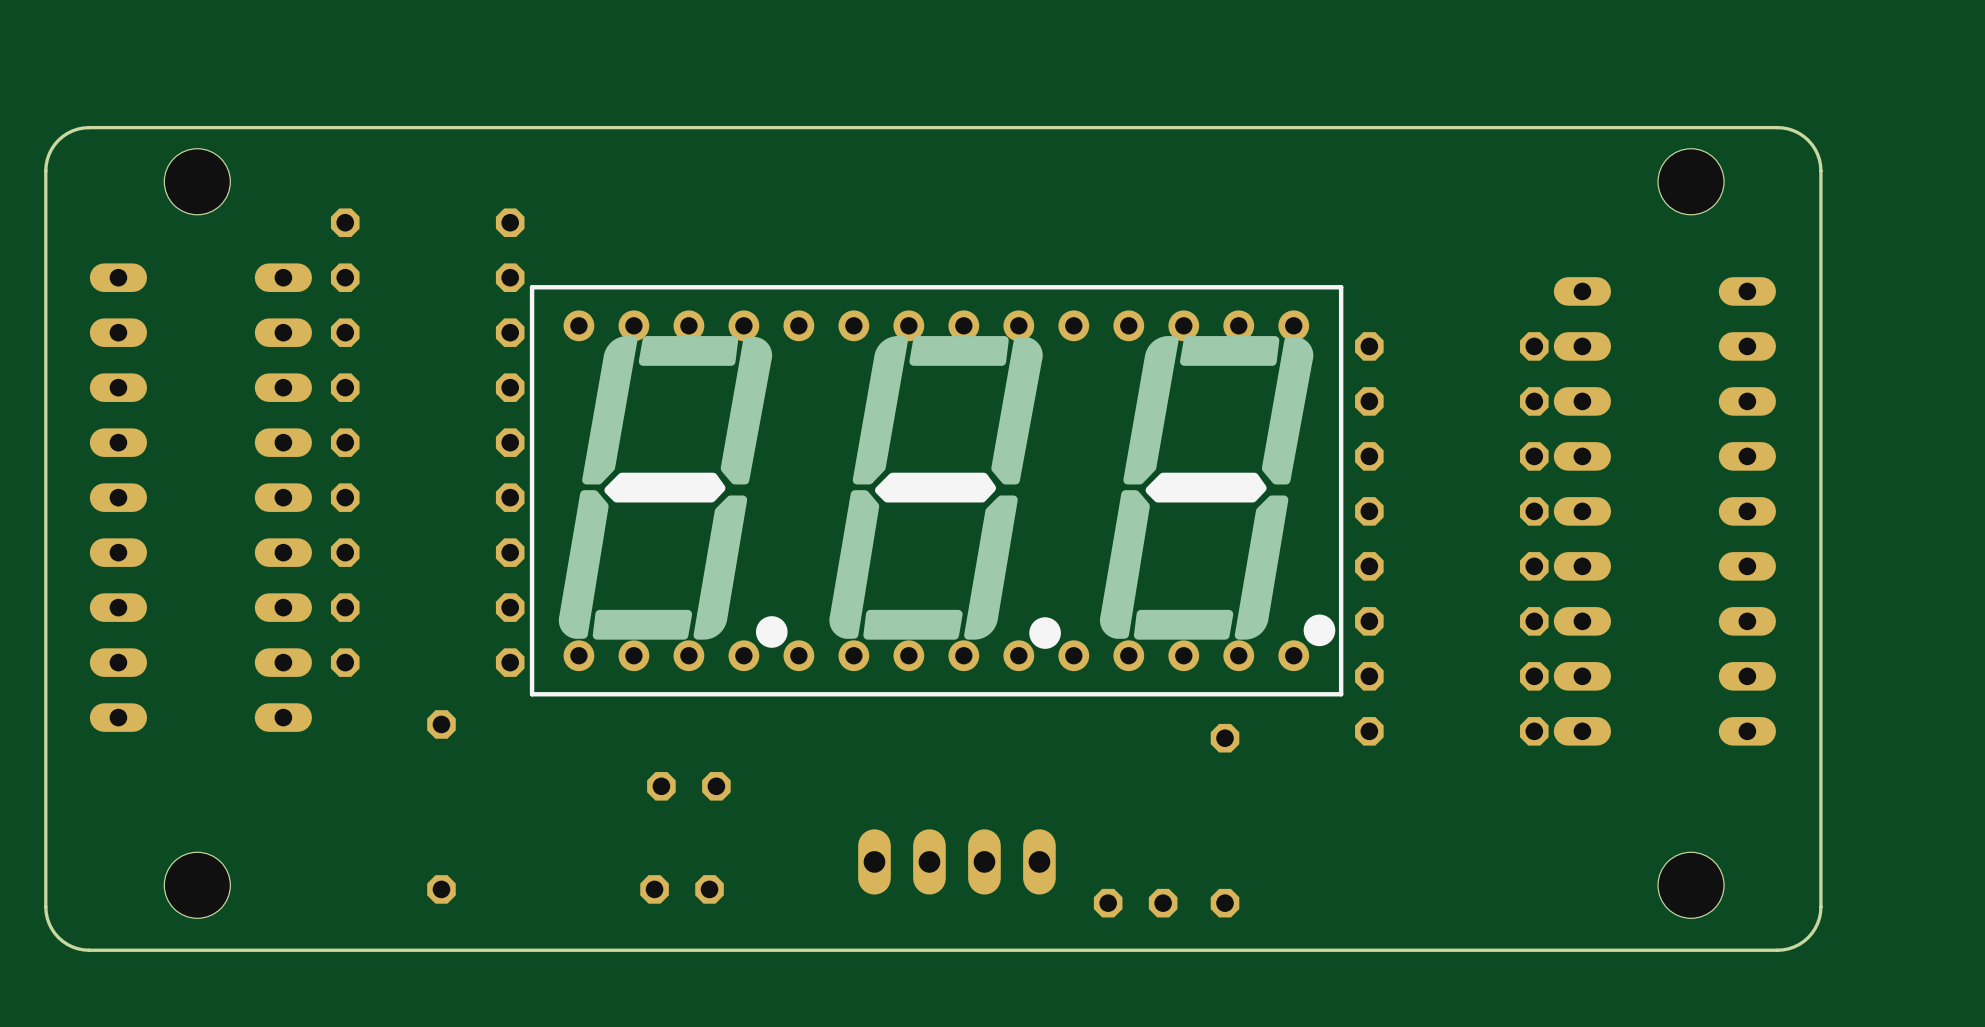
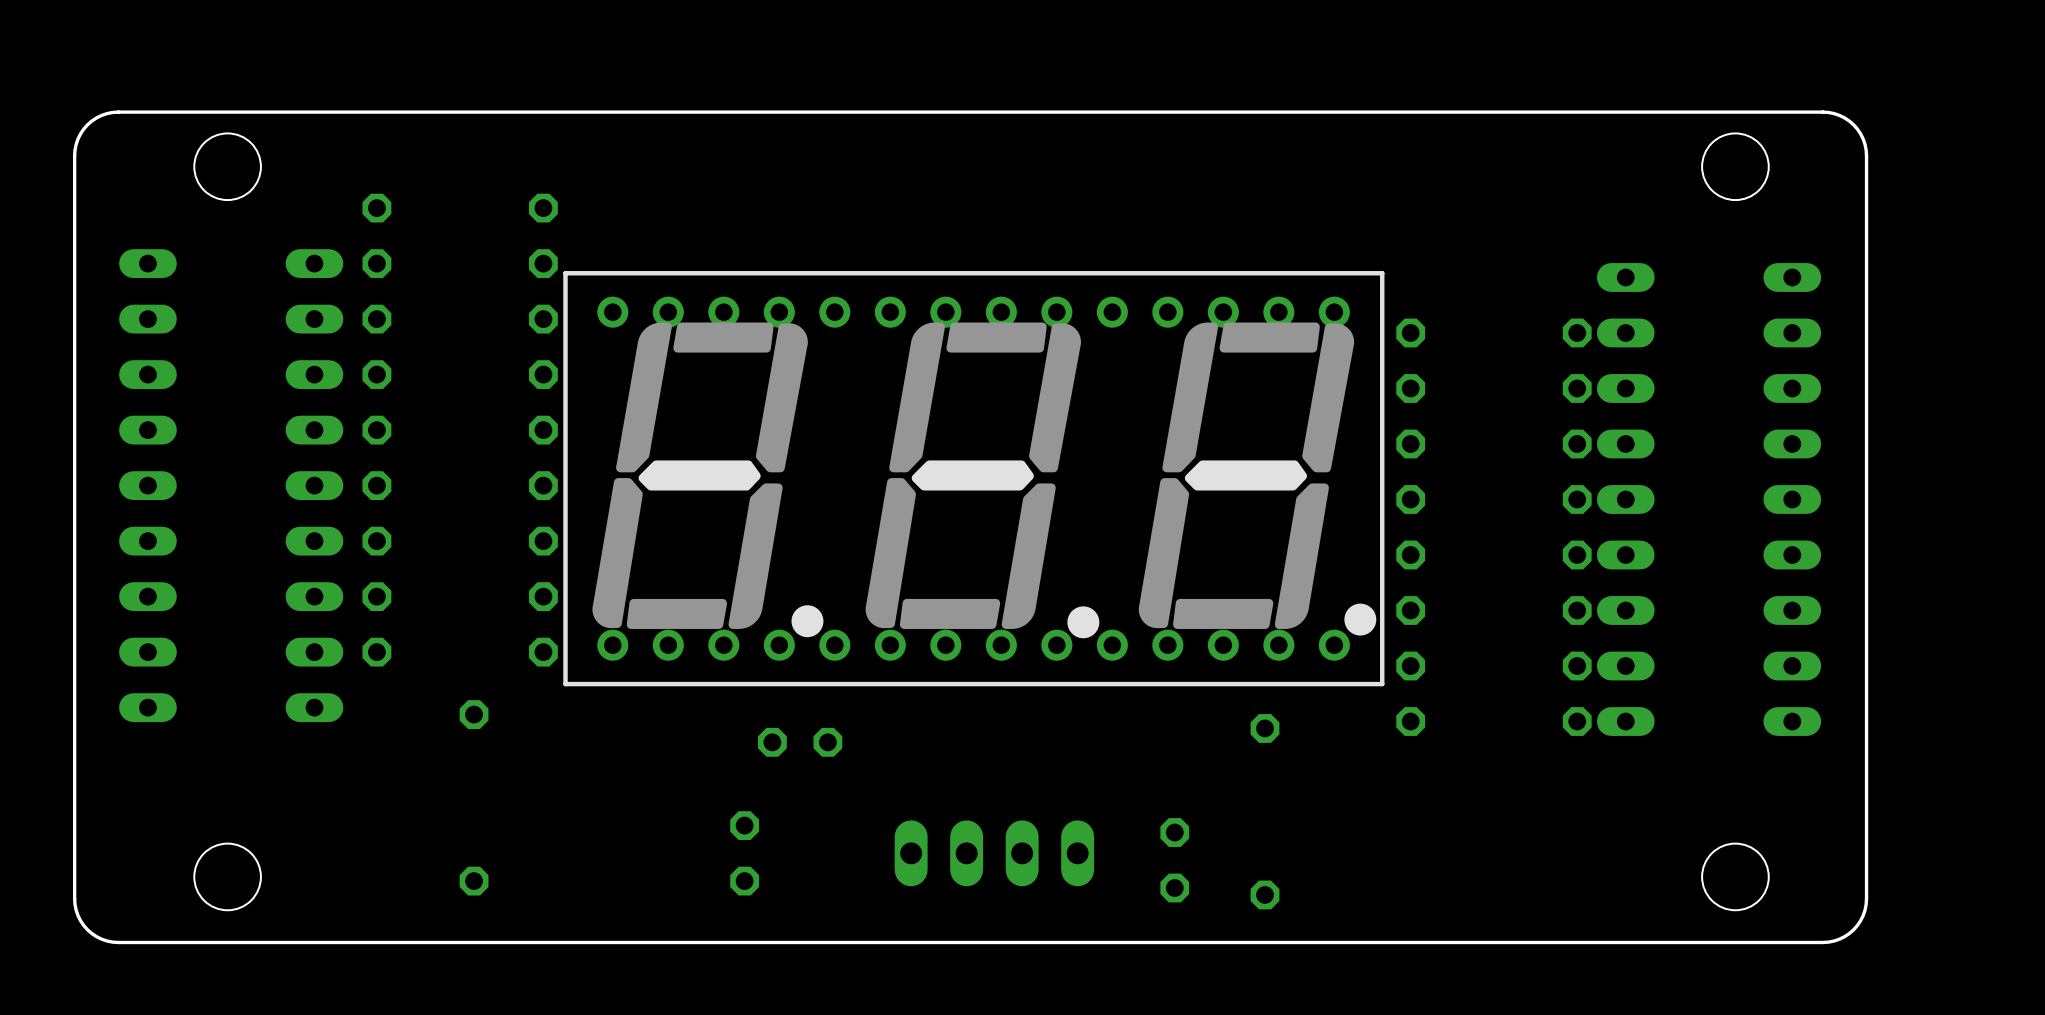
part: none -> (800, 742)
part: (688, 786) -> none
part rotation: 0° (682, 889) -> 90° clockwise (744, 853)
part rotation: 0° (1135, 903) -> 90° clockwise (1174, 860)

